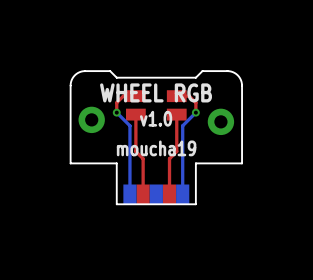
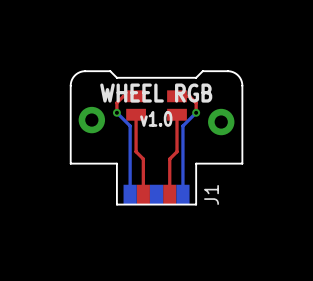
text: moucha19 (156, 148) -> none
J1 name: none -> J1 (211, 194)

